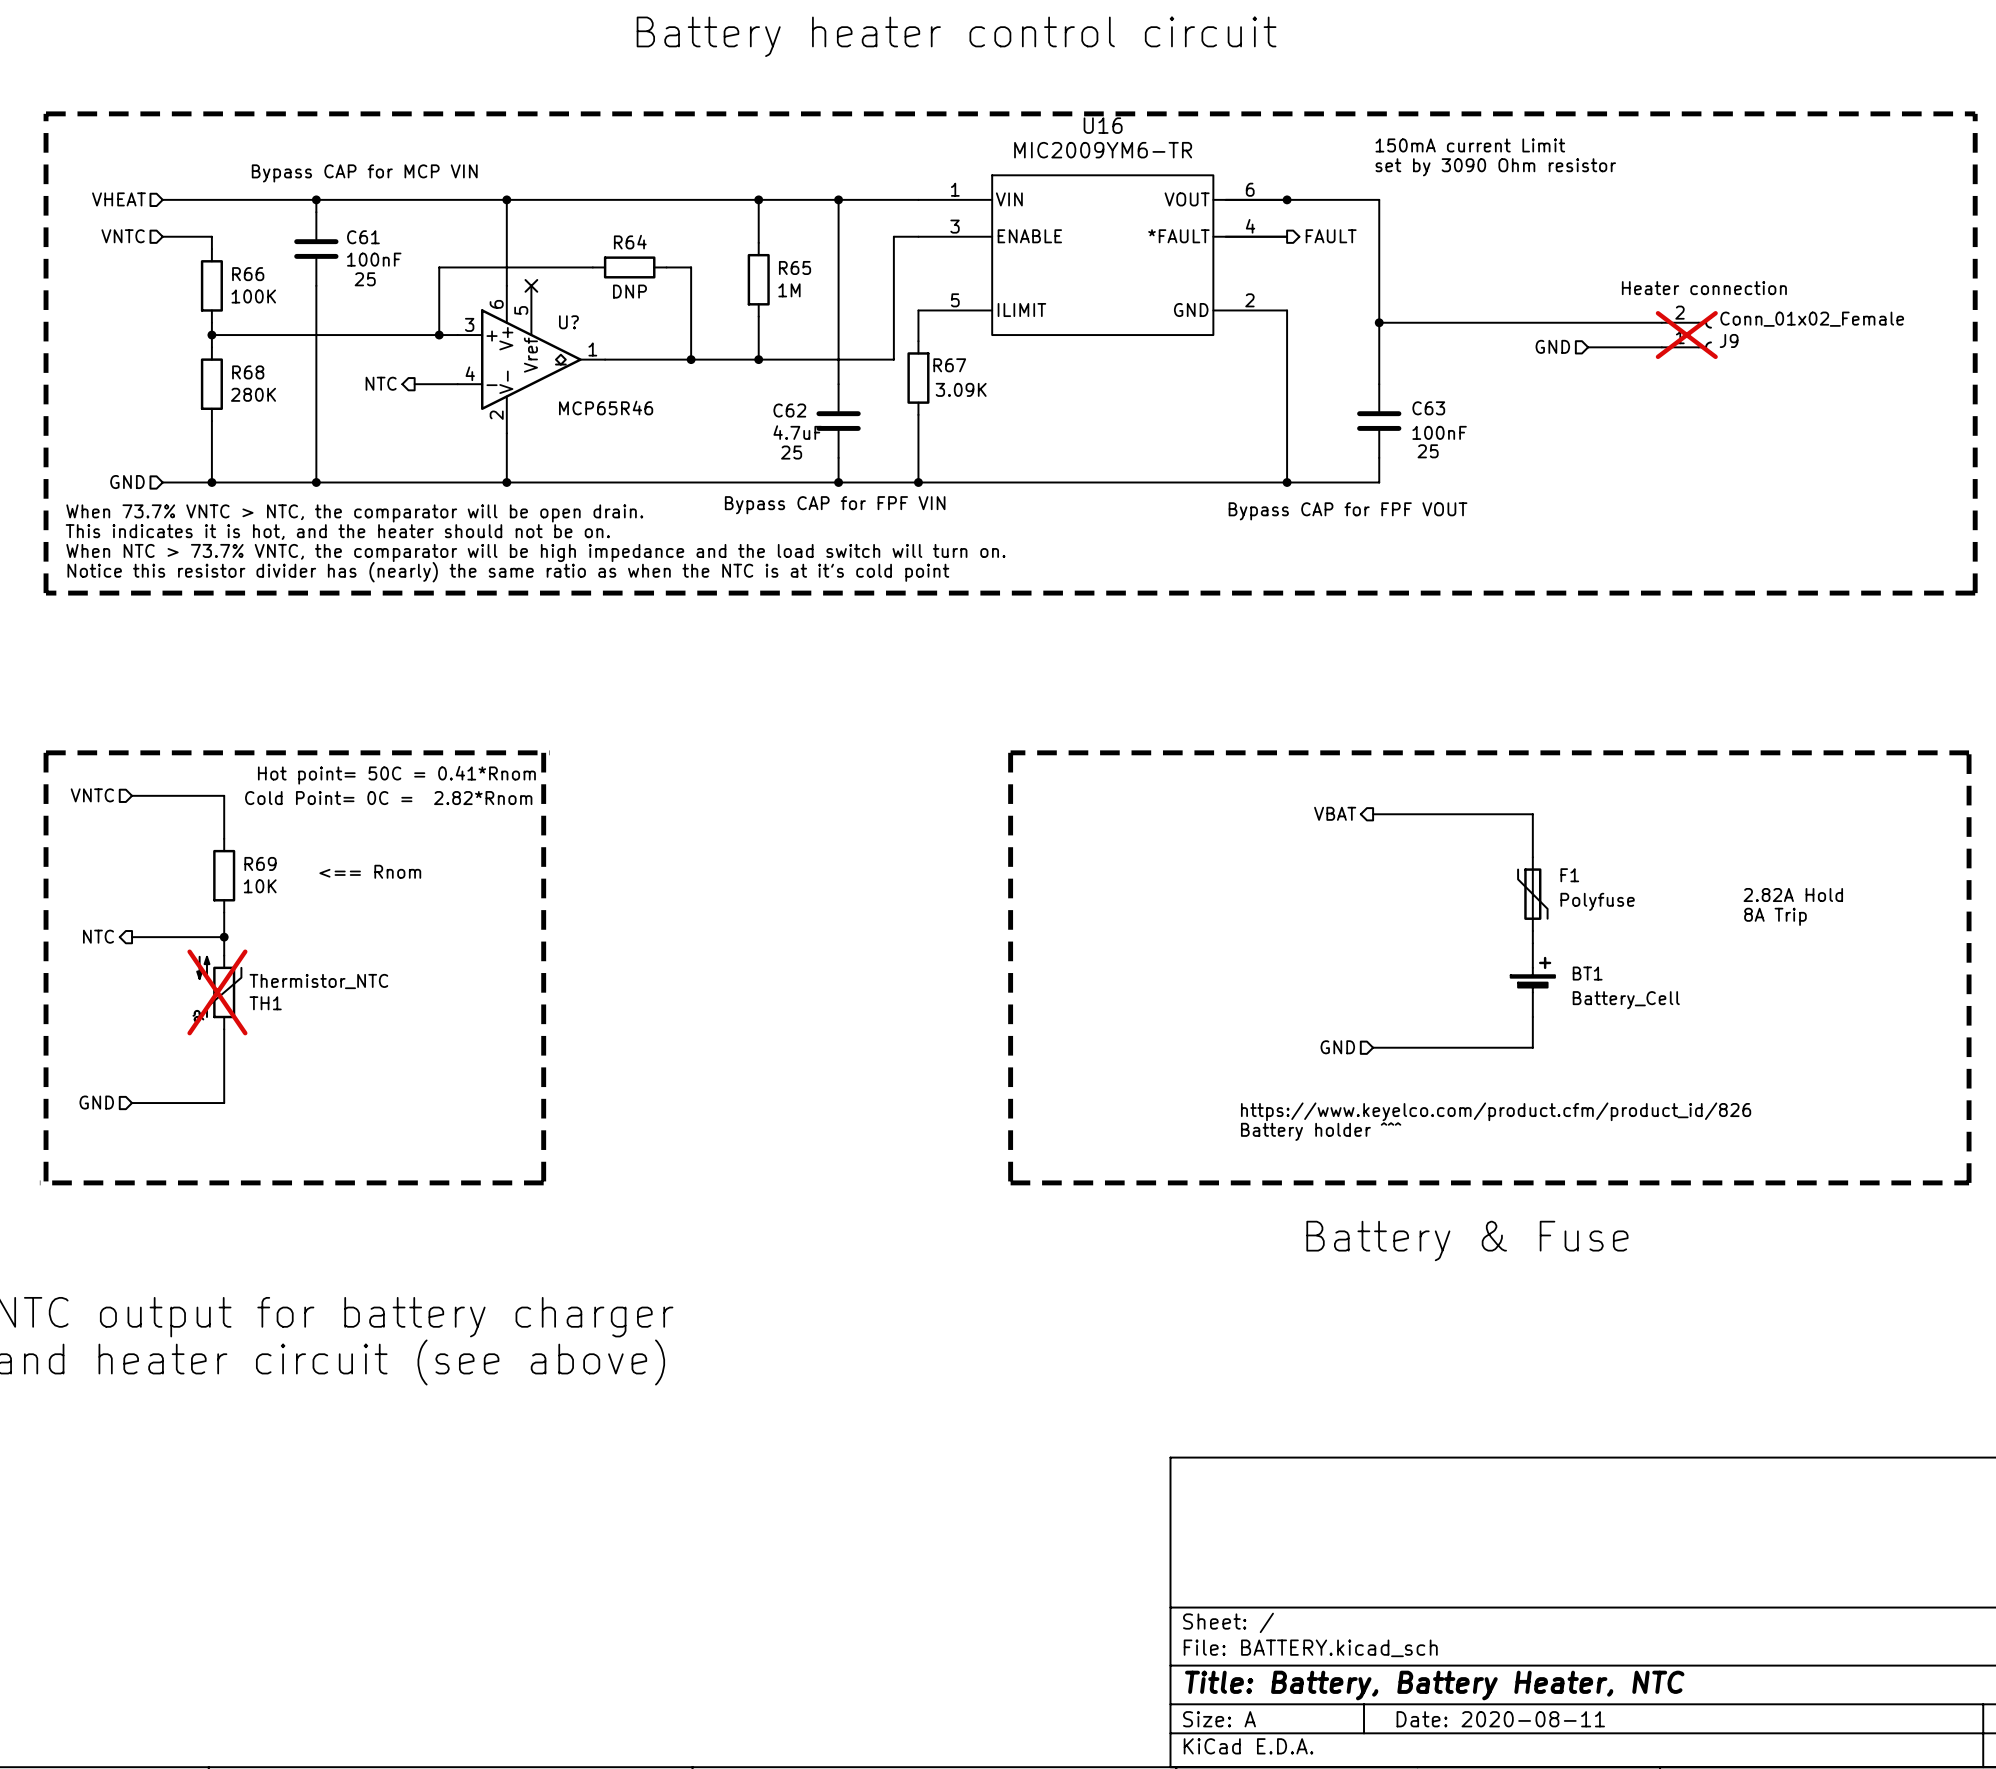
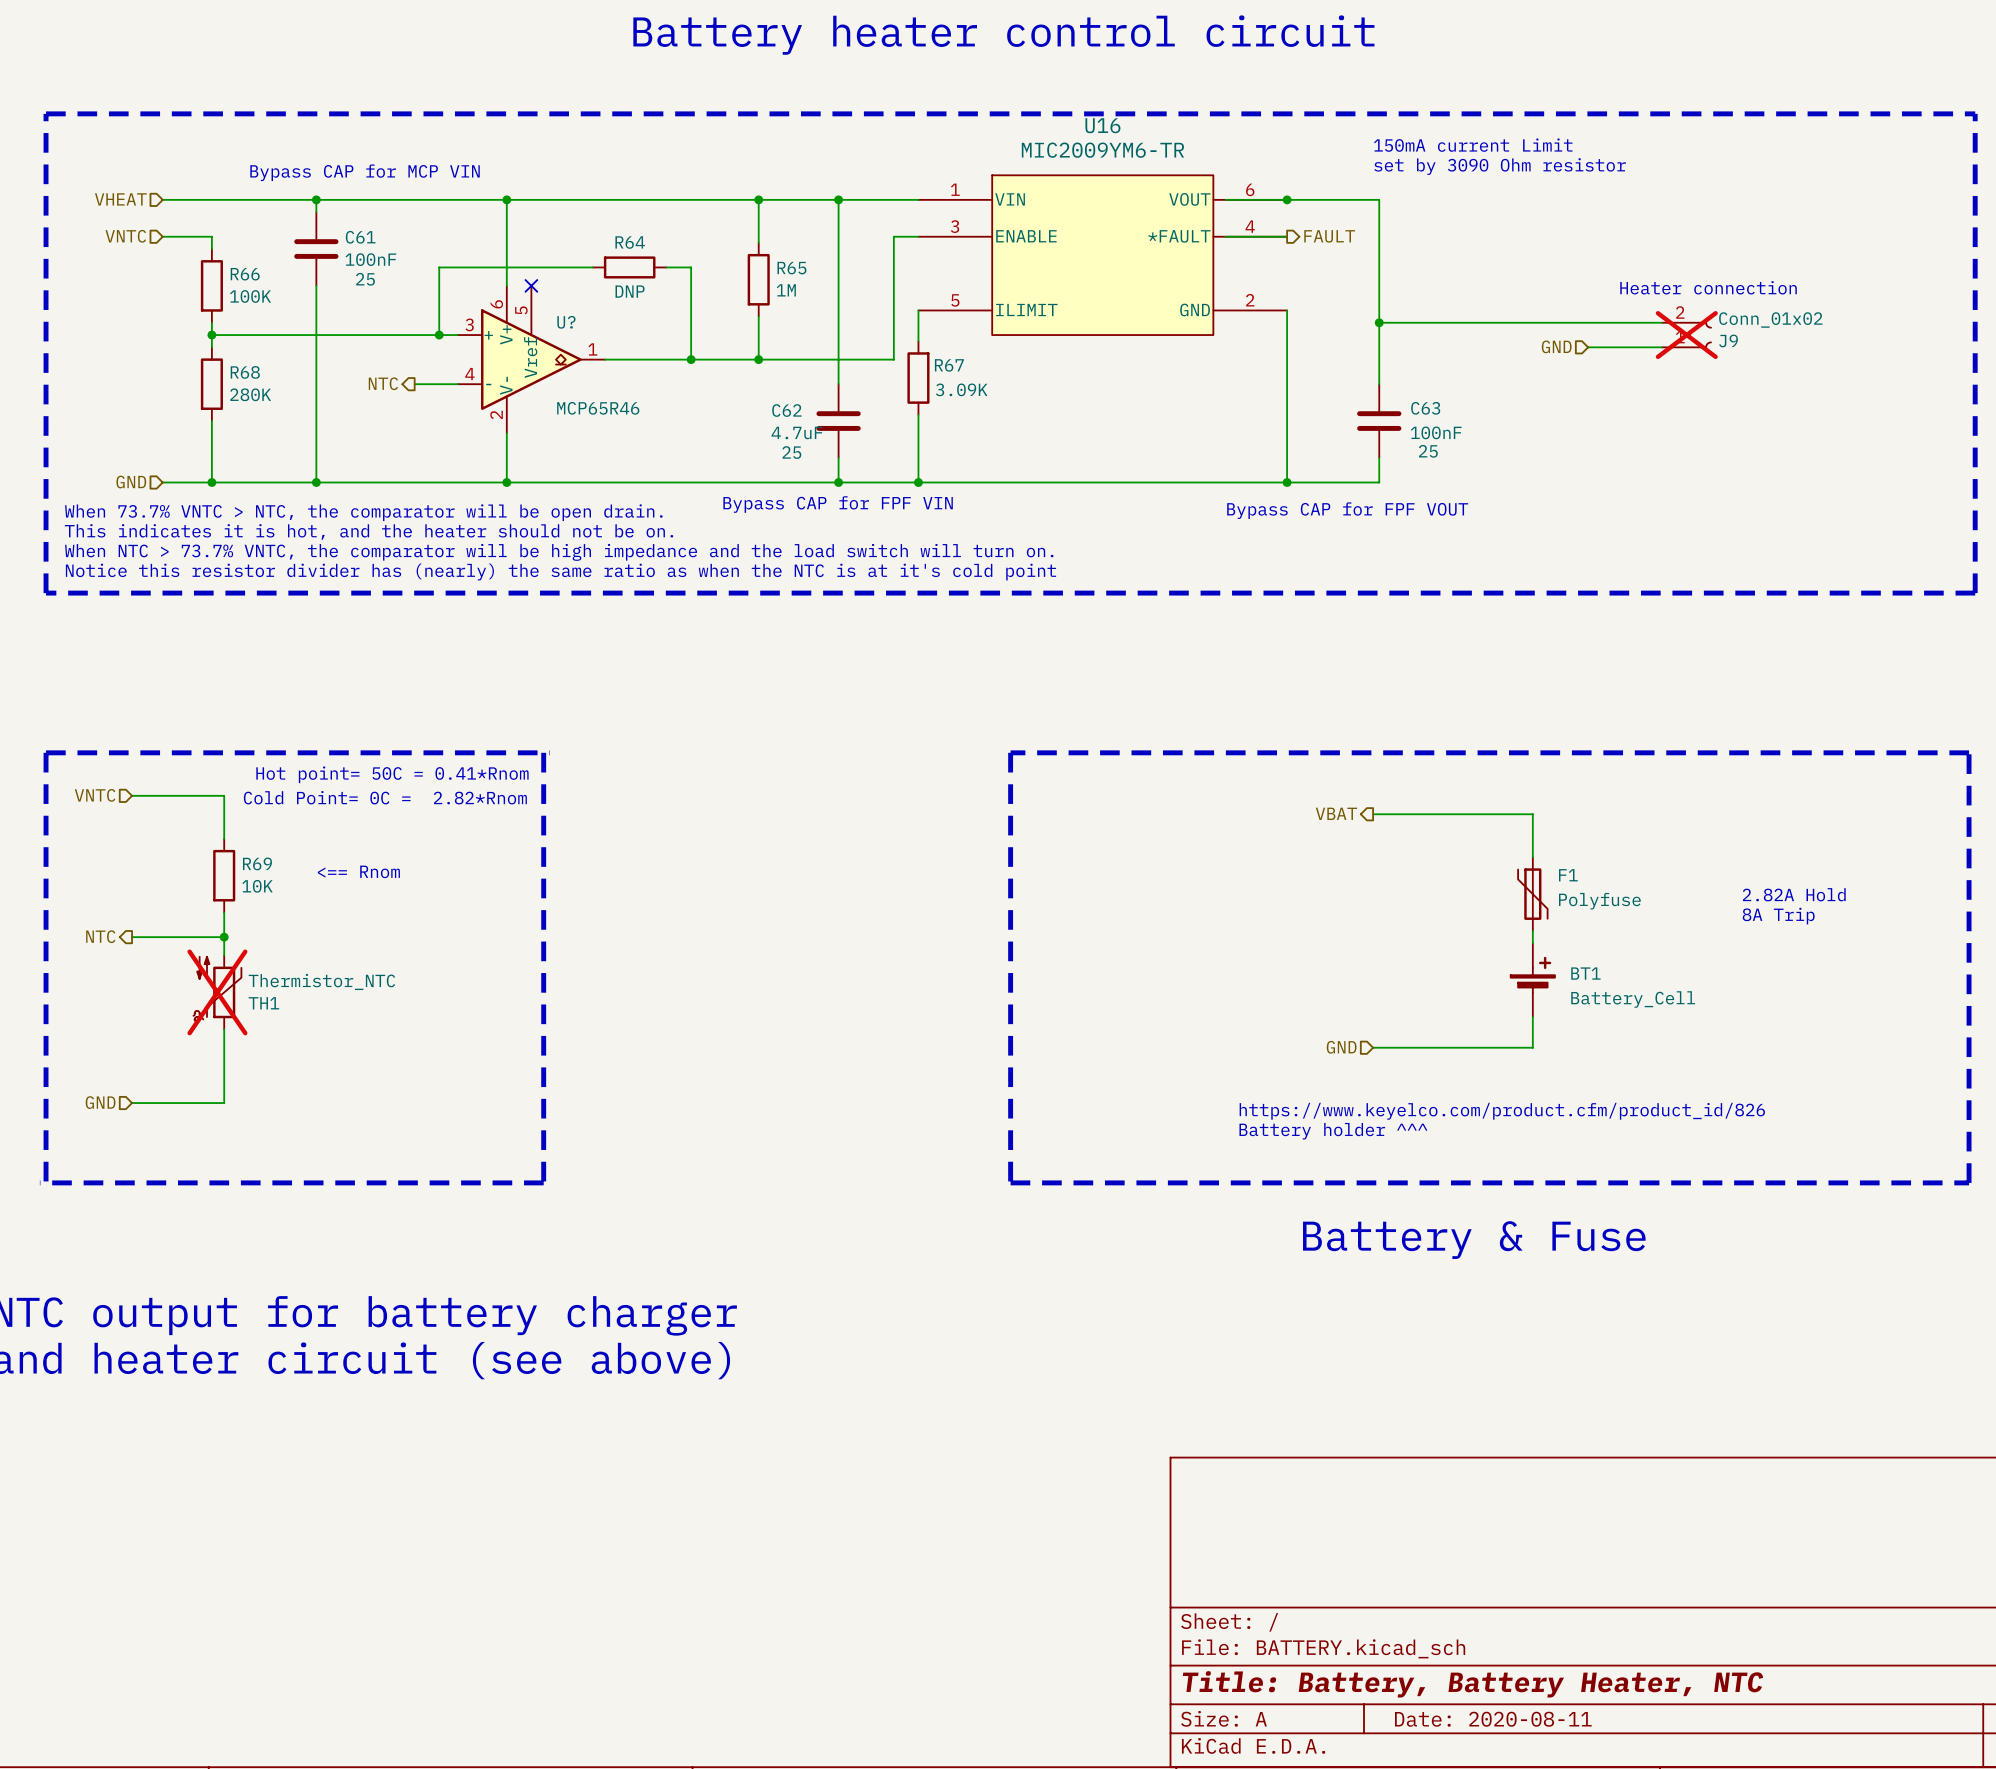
J9 value: Conn_01x02_Female (1812, 319) -> Conn_01x02 (1770, 319)

